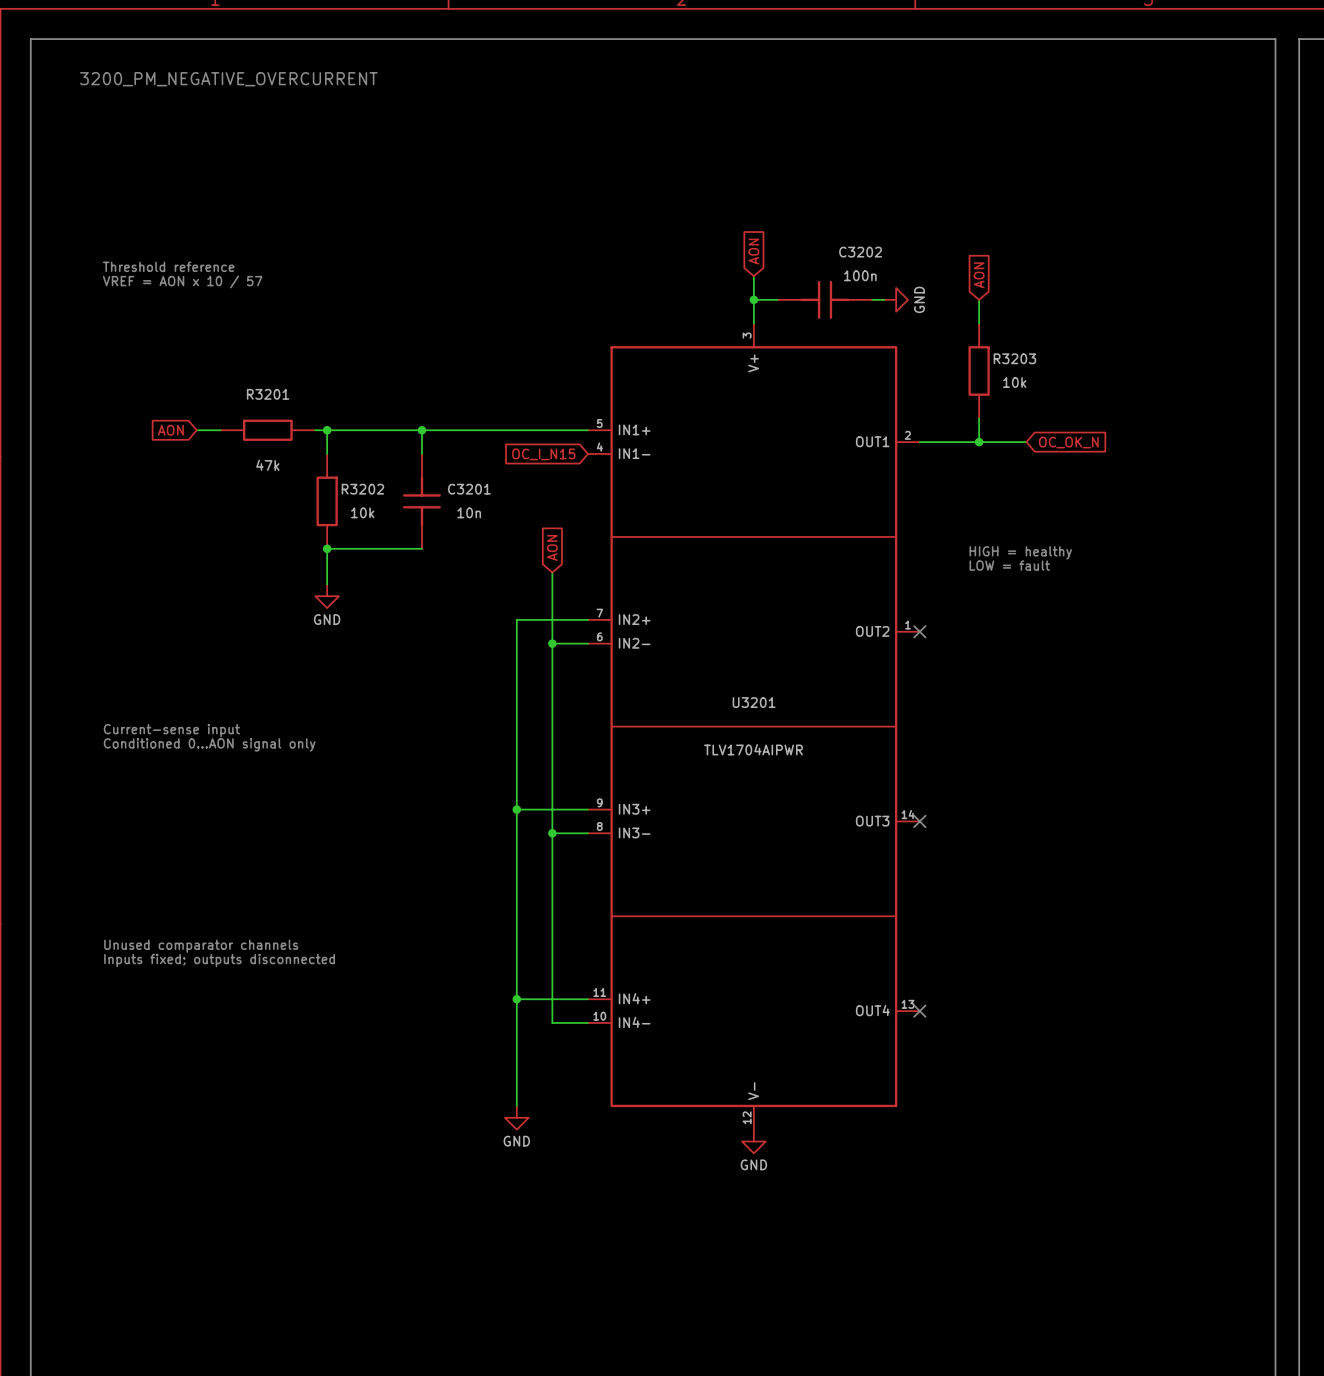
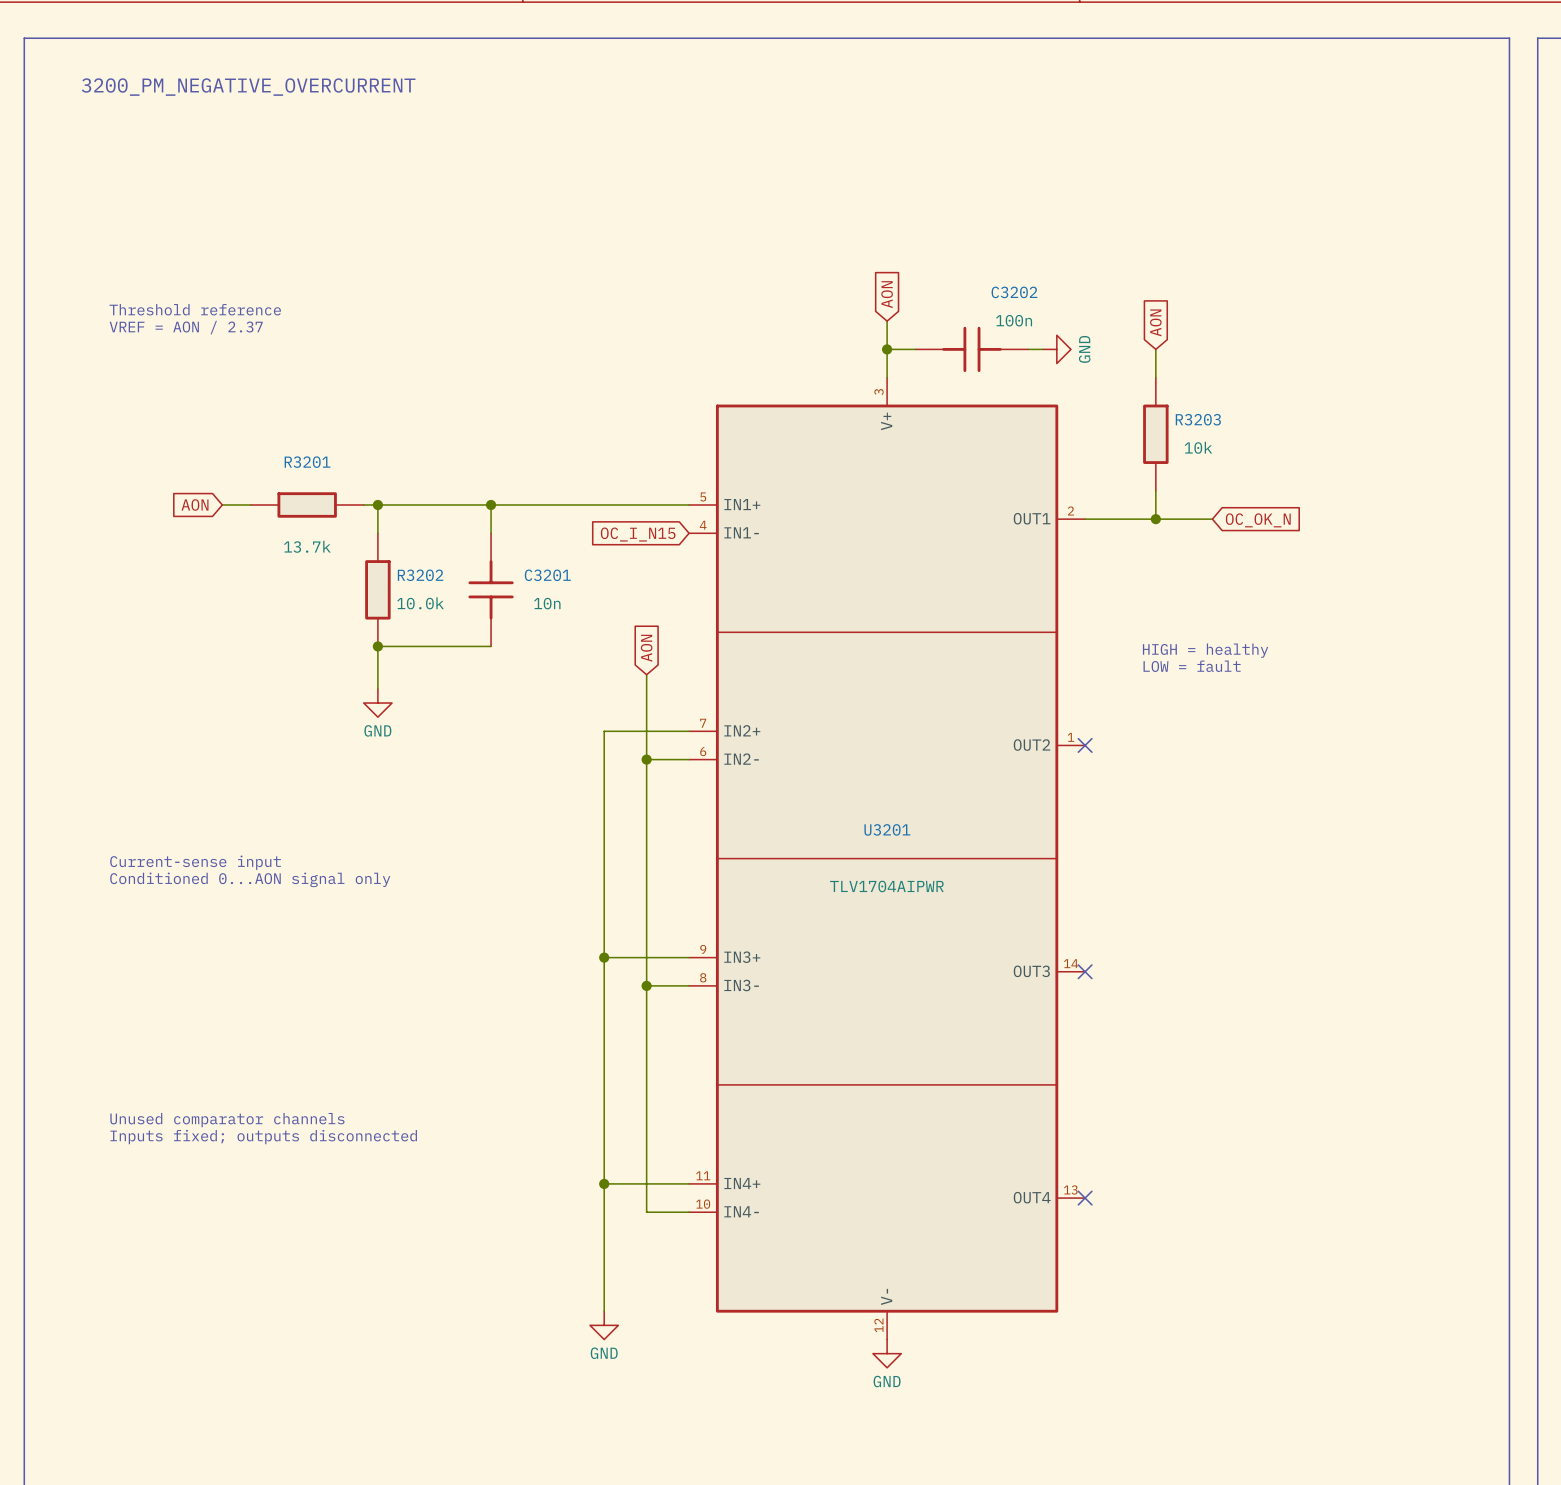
text: VREF = AON x 10 / 57 (182, 281) -> VREF = AON / 2.37 (186, 327)
R3201 value: 47k (267, 465) -> 13.7k (307, 546)
R3202 value: 10k (362, 512) -> 10.0k (420, 603)

